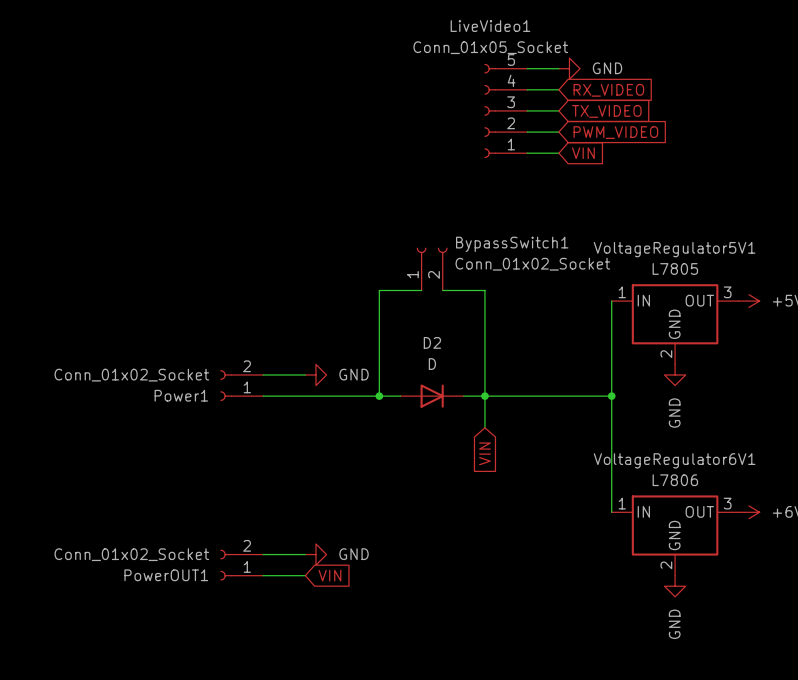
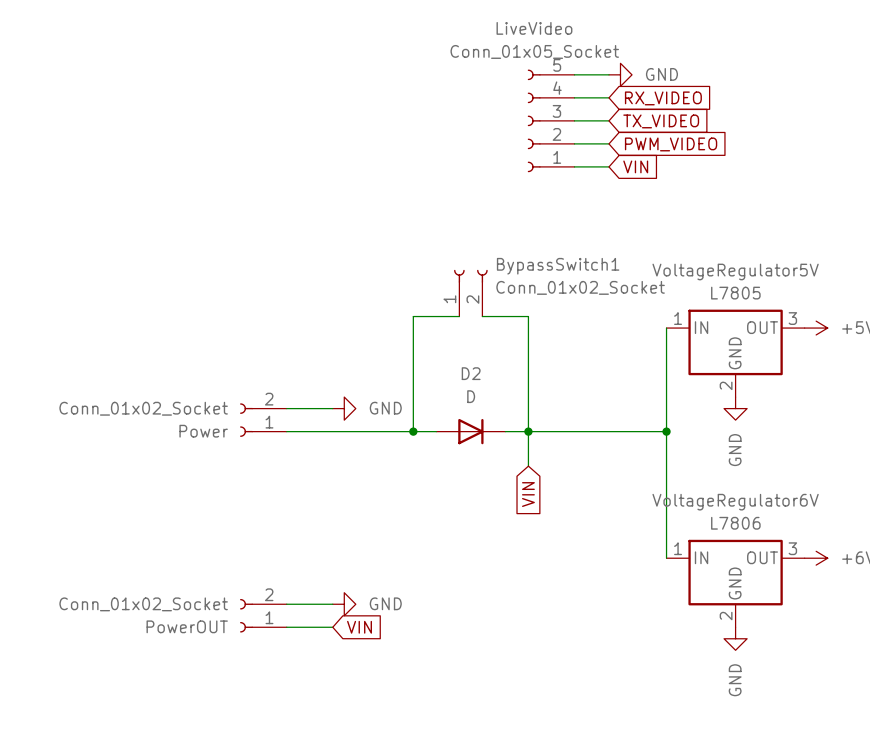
LiveVideo1 name: LiveVideo1 (490, 26) -> LiveVideo (534, 28)
VoltageRegulator5V1 name: VoltageRegulator5V1 (674, 249) -> VoltageRegulator5V (735, 271)
Power1 name: Power1 (181, 395) -> Power (203, 431)
VoltageRegulator6V1 name: VoltageRegulator6V1 (674, 460) -> VoltageRegulator6V (735, 502)
PowerOUT1 name: PowerOUT1 (166, 575) -> PowerOUT (187, 626)

